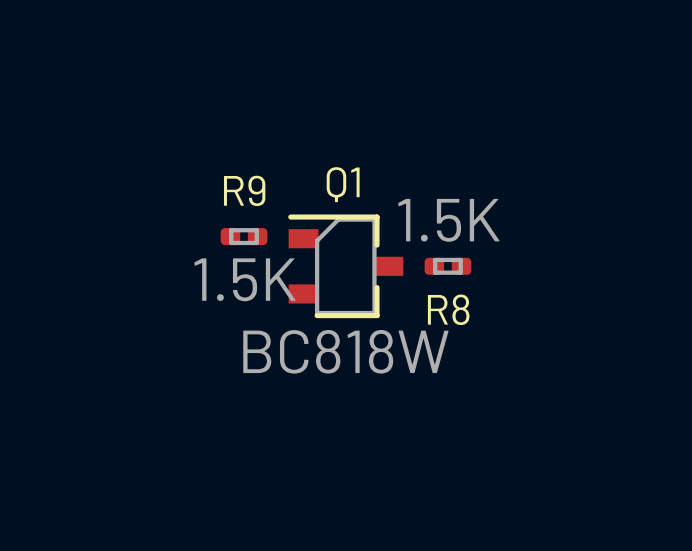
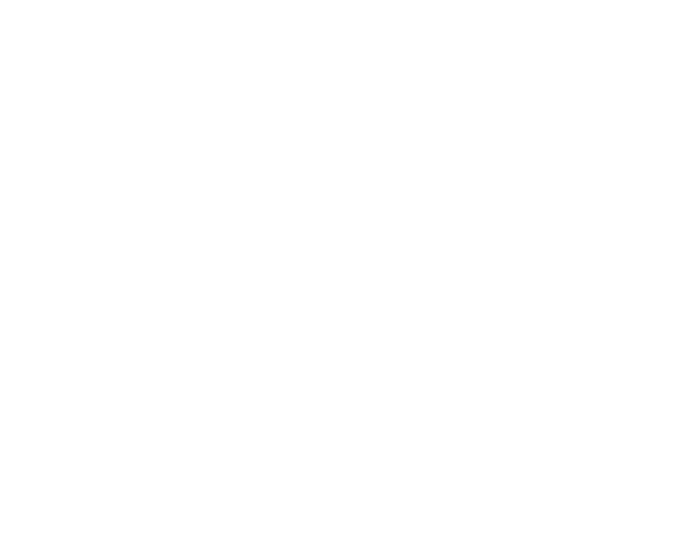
R9: 1.5K (244, 236) -> none
Q1: BC818W (345, 266) -> none
R8: 1.5K (447, 266) -> none

